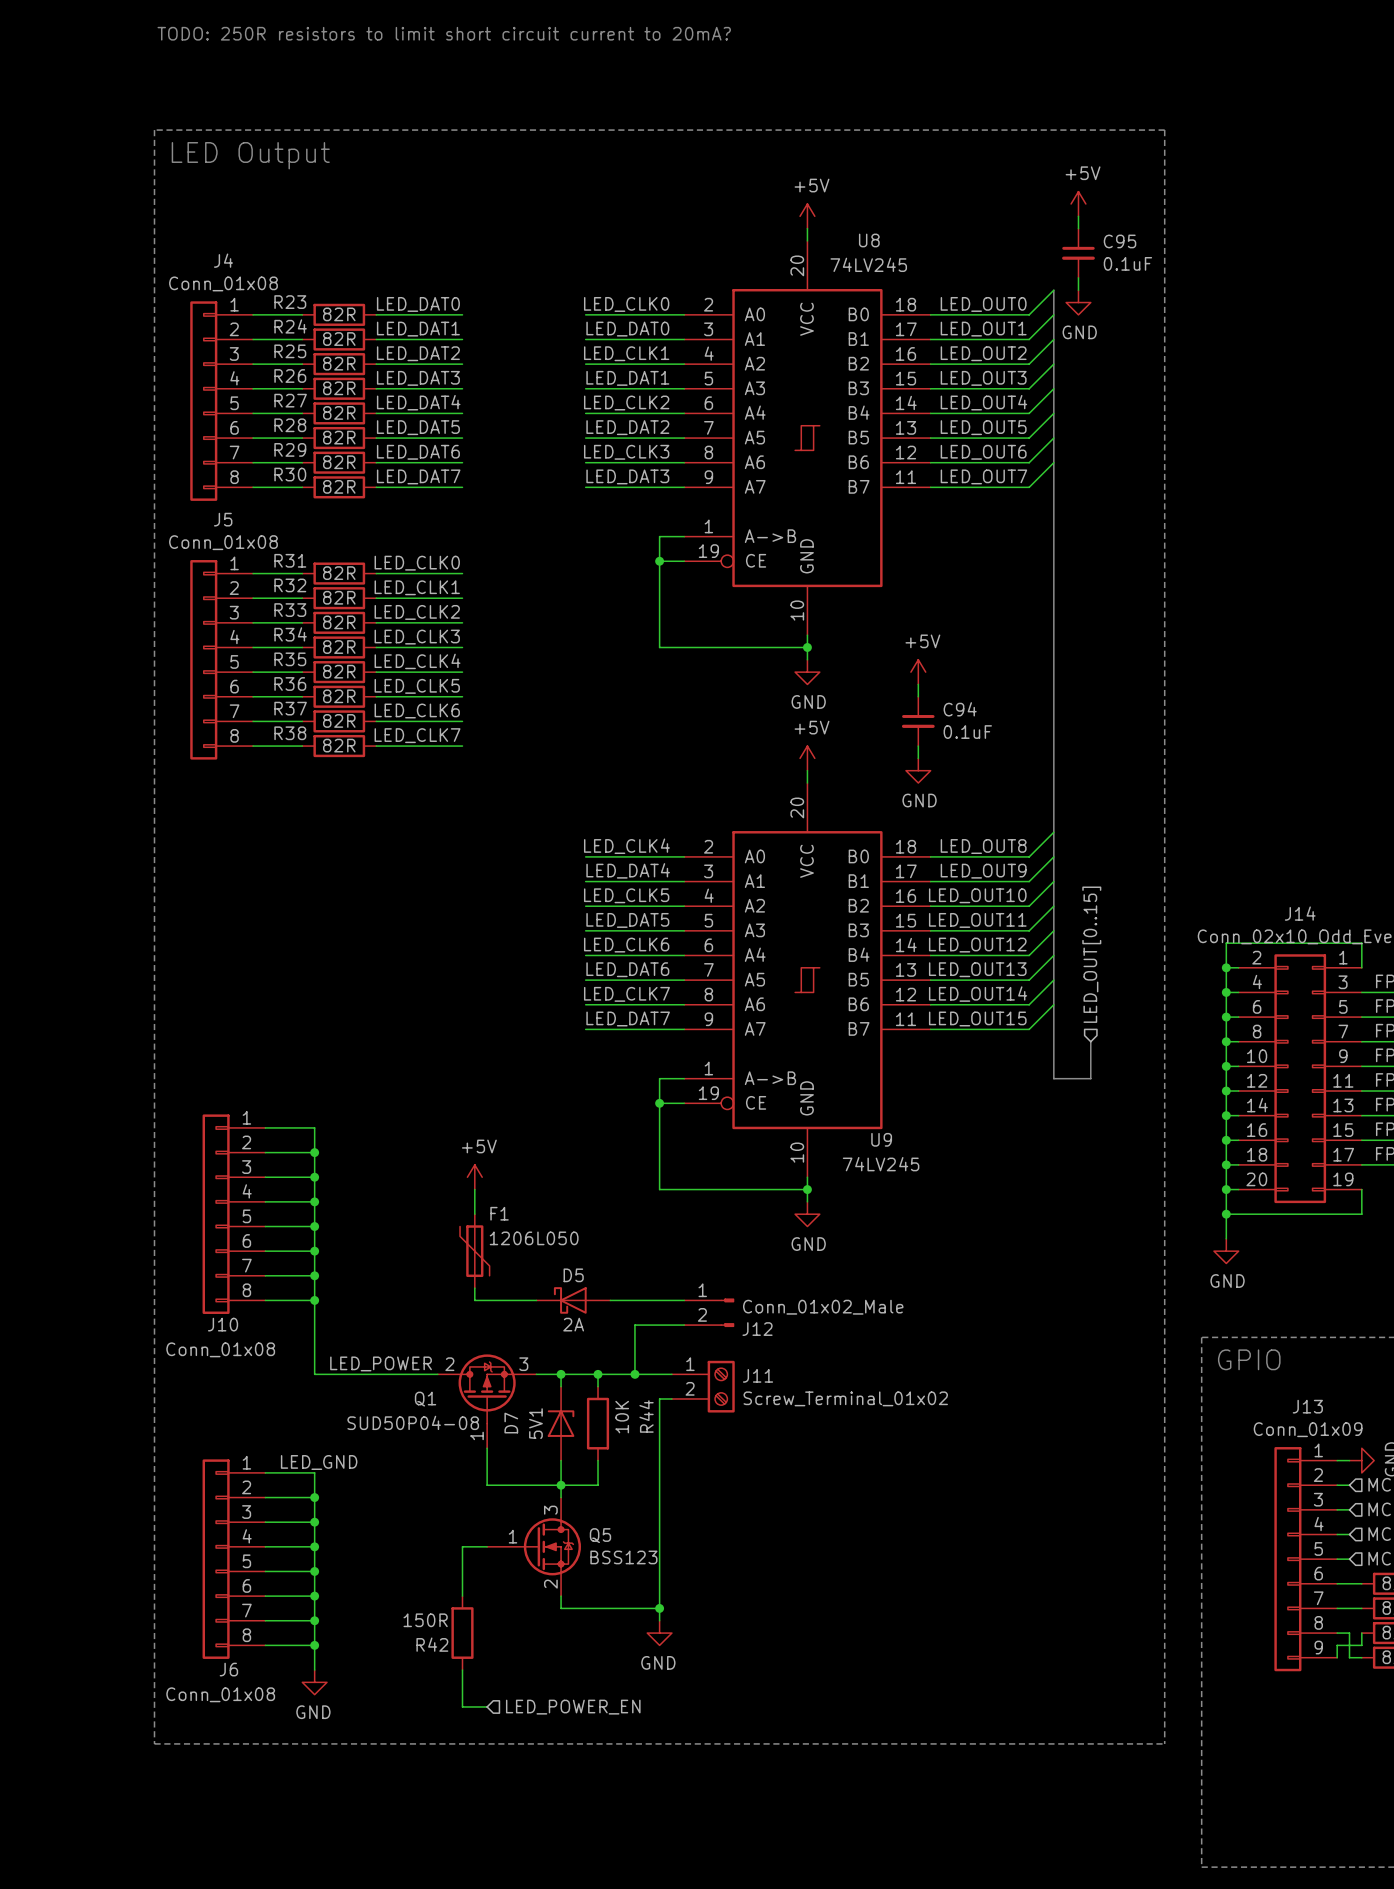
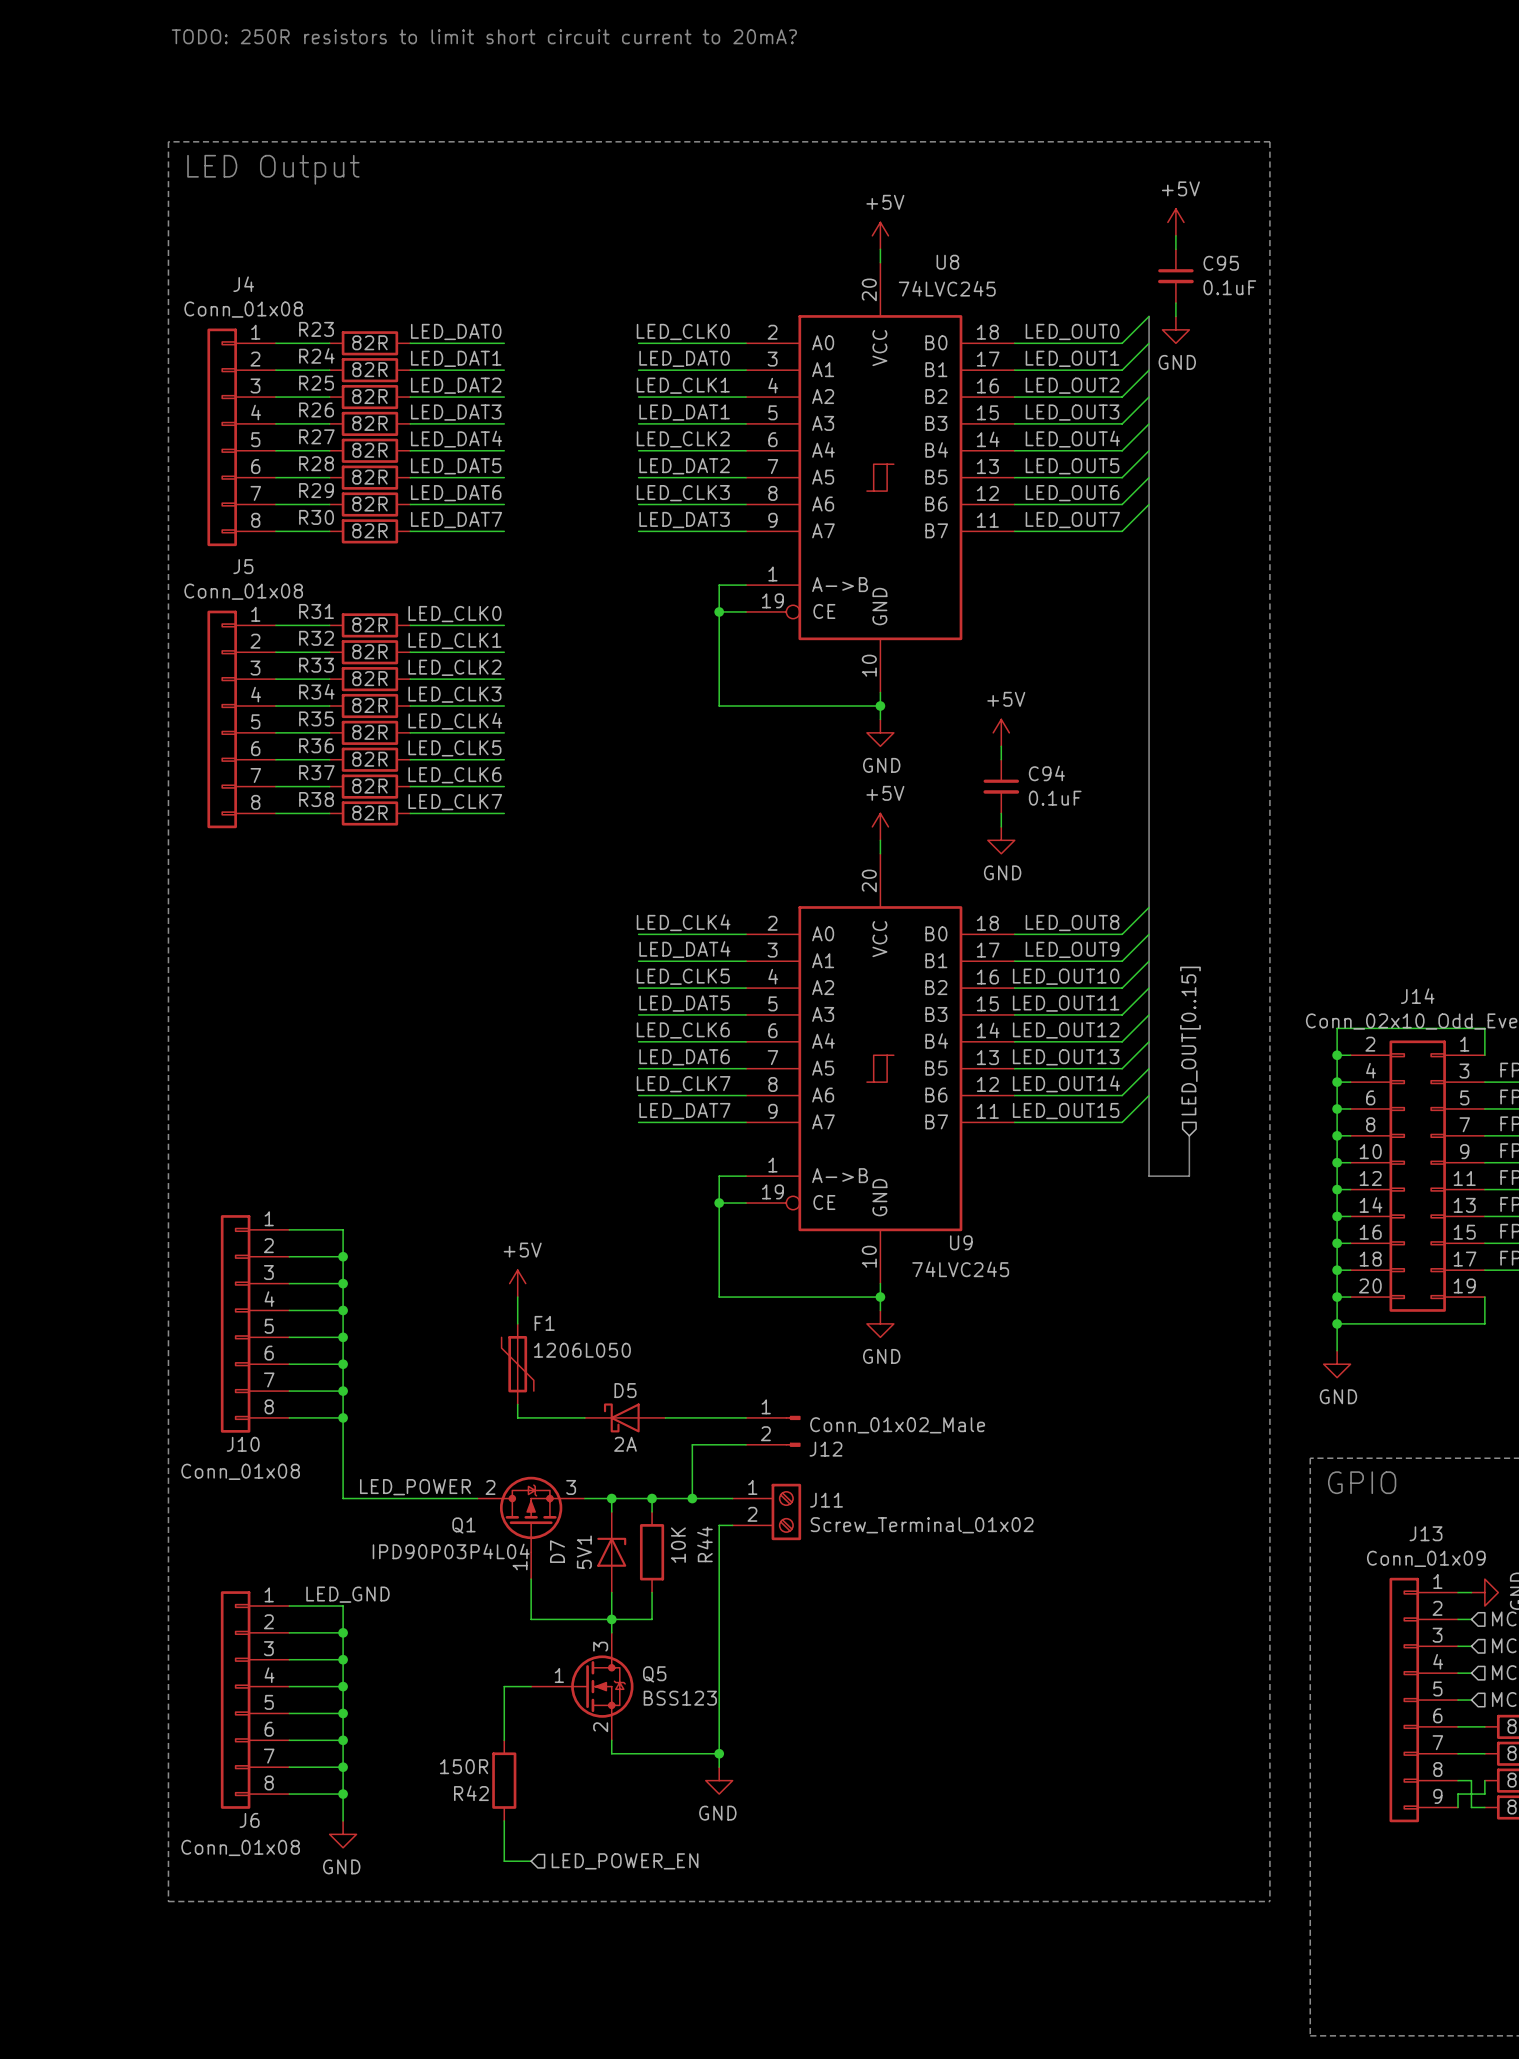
U8 value: 74LV245 (868, 264) -> 74LVC245 (947, 288)
U9 value: 74LV245 (881, 1164) -> 74LVC245 (960, 1269)
Q1 value: SUD50P04-08 (413, 1422) -> IPD90P03P4L04 (451, 1551)

